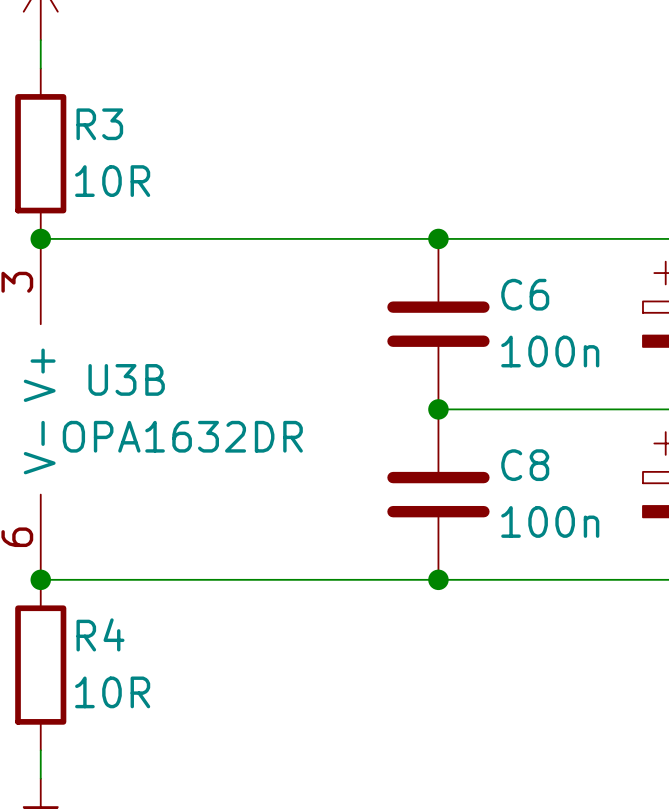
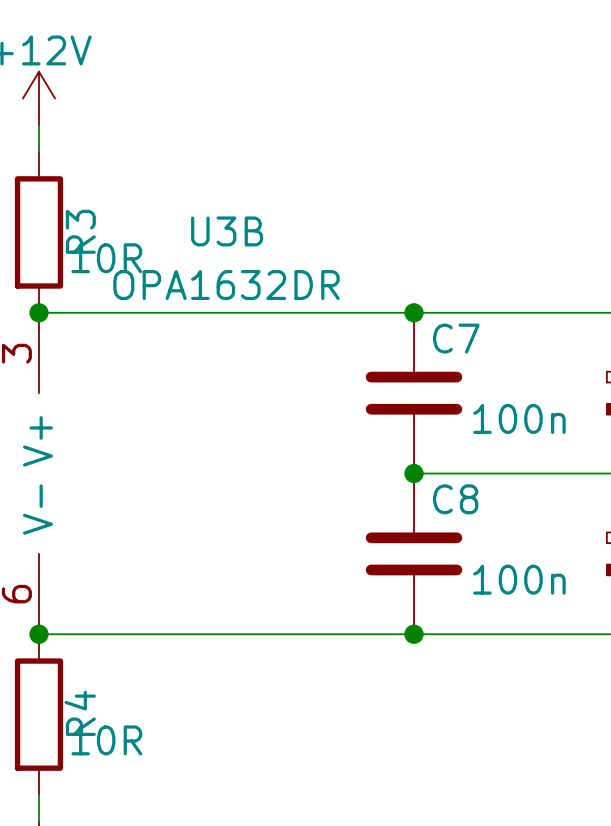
R3 name rotation: 0° (99, 124) -> 90° counterclockwise (80, 231)
C6 name: C6 (525, 294) -> C7 (456, 338)
U3B name position: U3B (126, 379) -> U3B (227, 231)
U3B value position: OPA1632DR (182, 436) -> OPA1632DR (226, 285)
C8 name position: C8 (525, 465) -> C8 (455, 499)
R4 name rotation: 0° (100, 634) -> 90° counterclockwise (80, 713)

